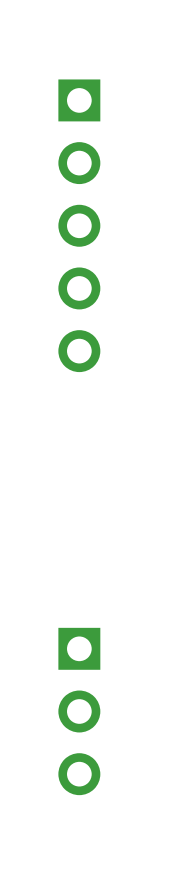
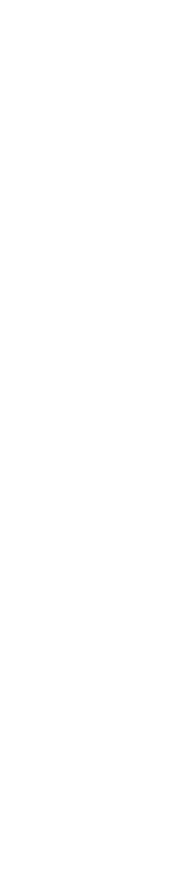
part: (79, 225) -> none
part: (79, 711) -> none

